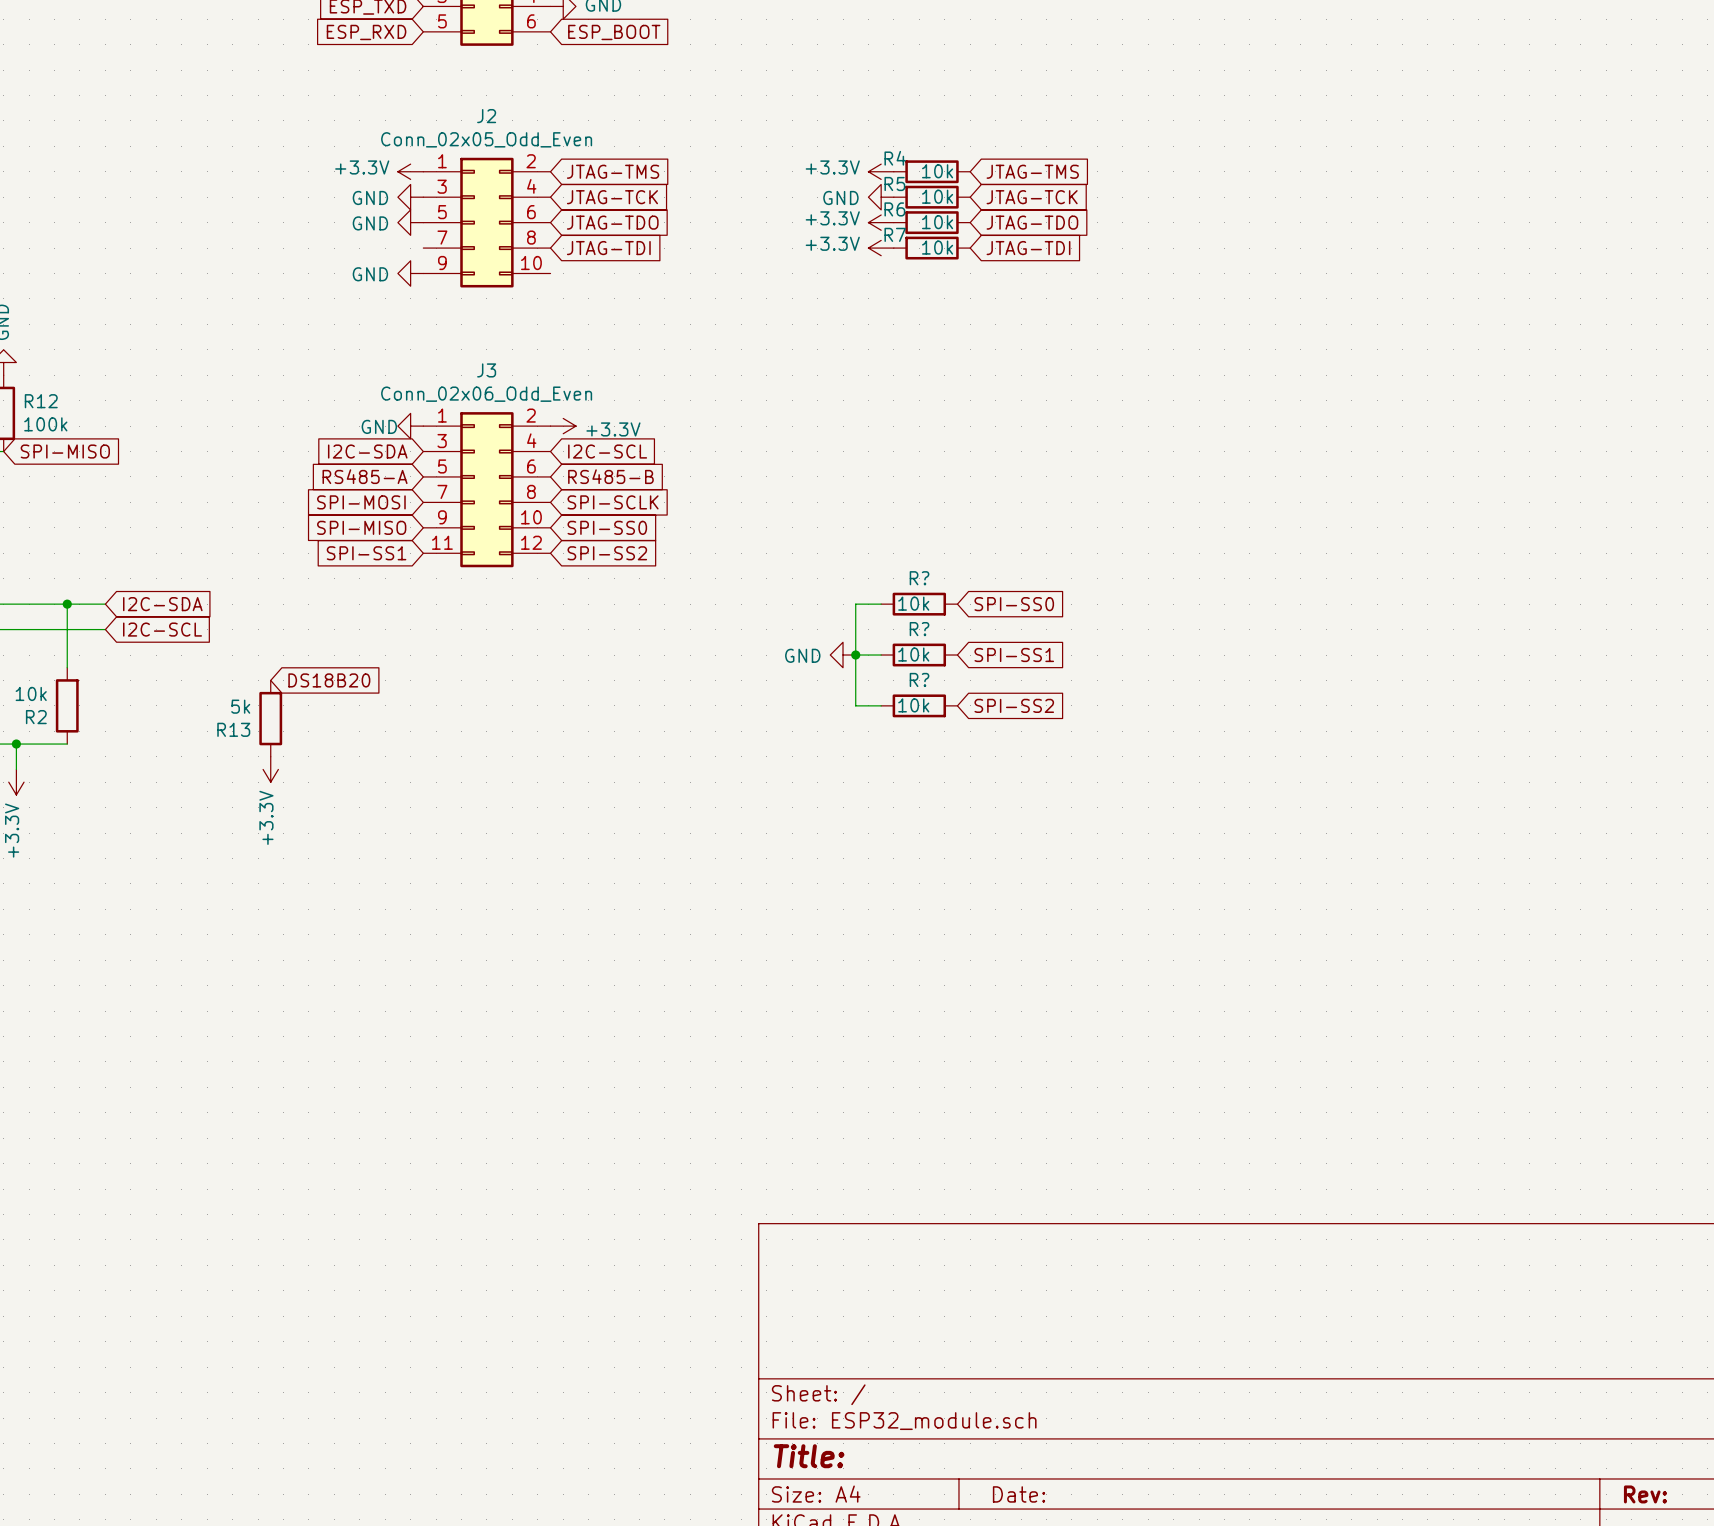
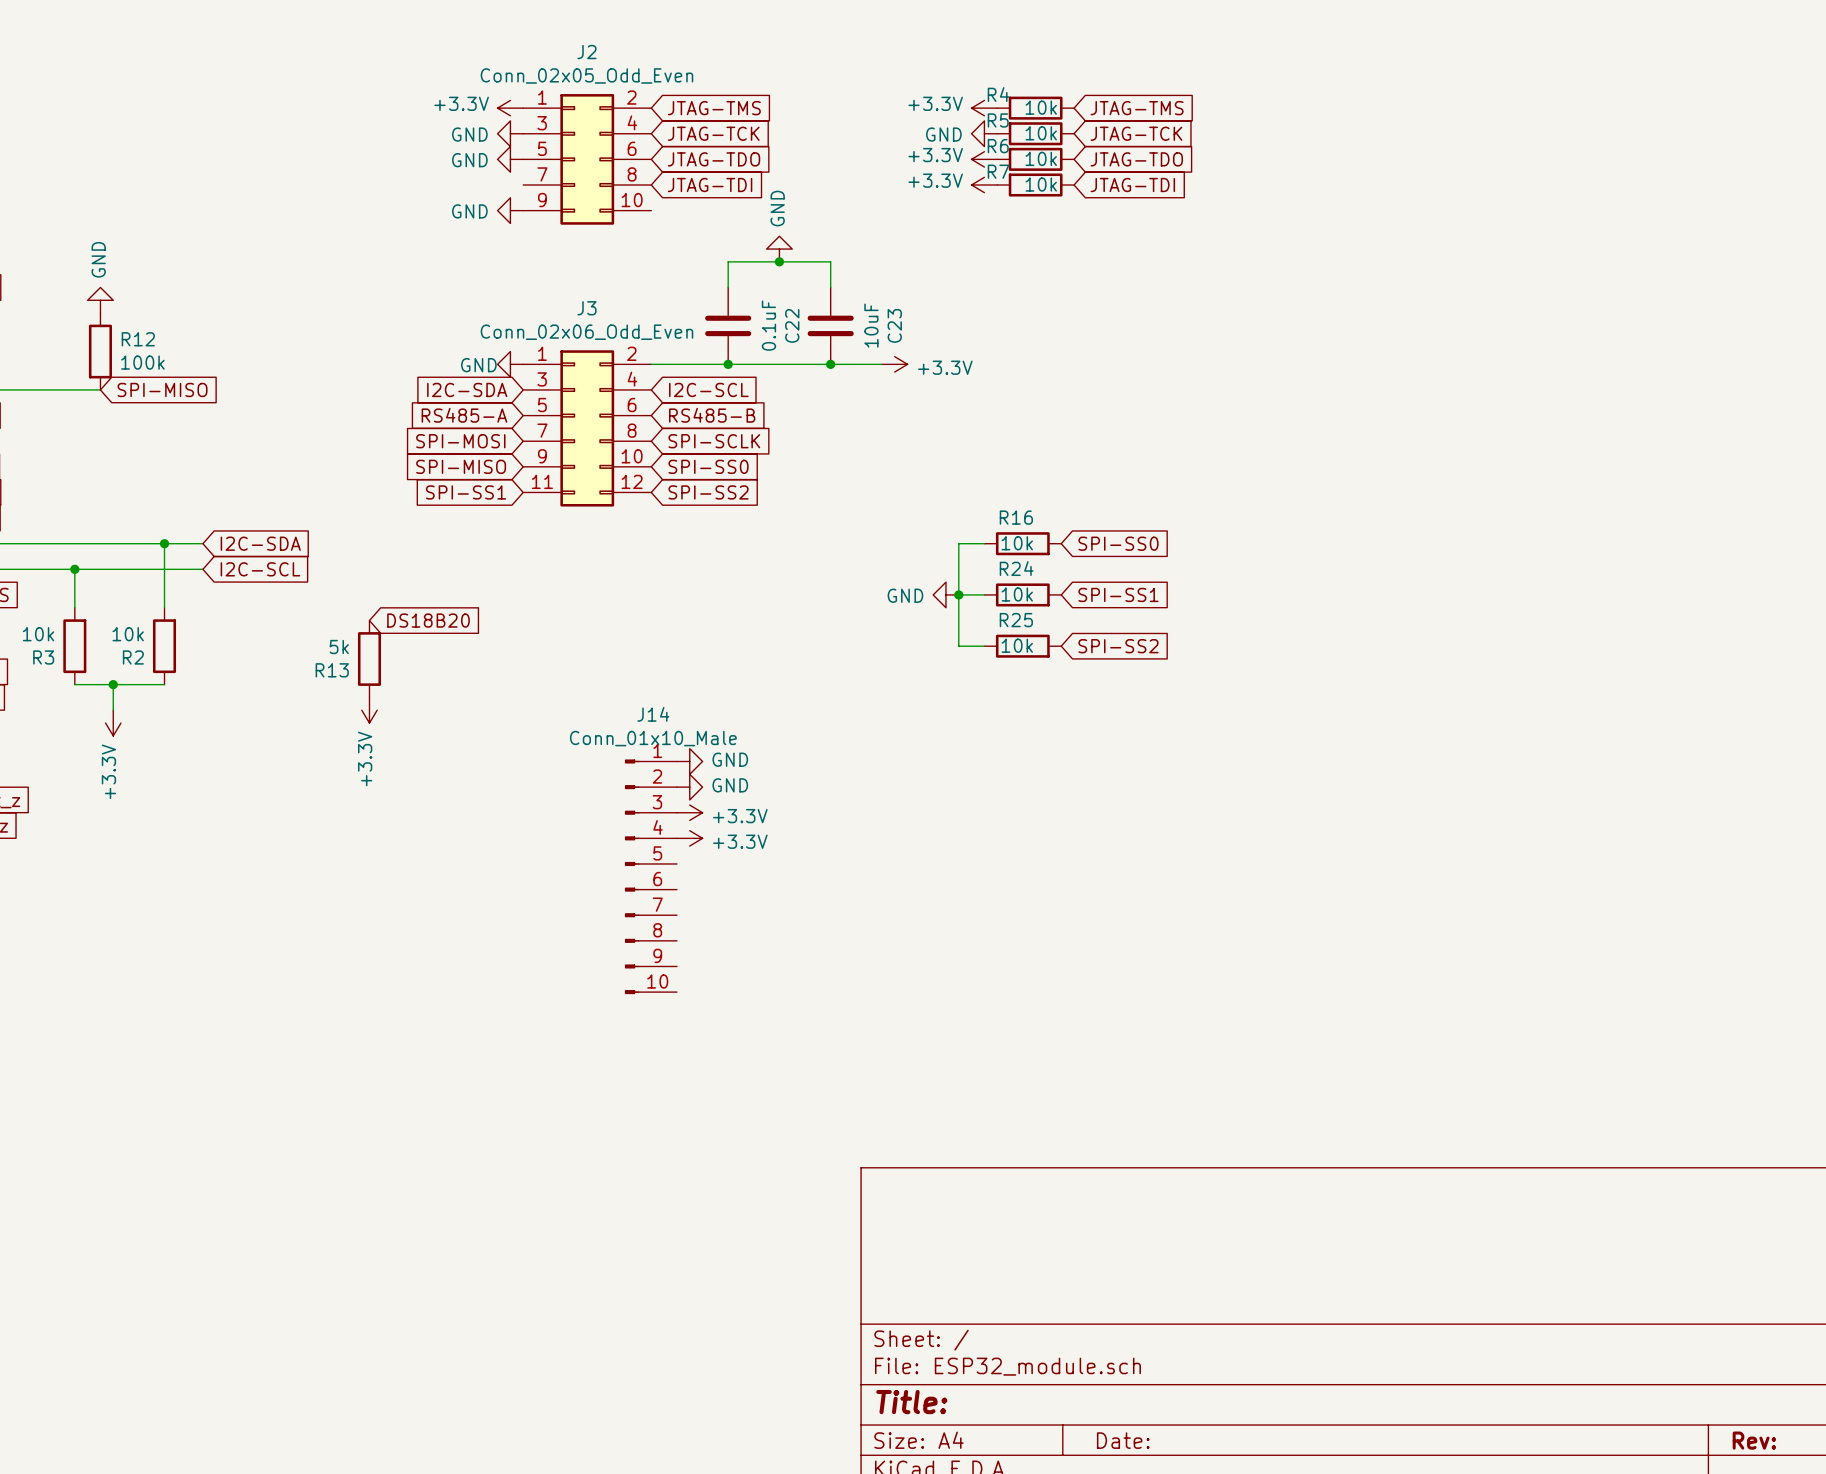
power symbol: none -> GND (779, 249)
junction: none -> (779, 261)
wire: none -> (728, 287) (728, 261) (830, 261) (830, 287)
C22: none -> 0.1uF (728, 325)
C23: none -> 10uF (830, 325)
wire: none -> (651, 364) (881, 364)
power symbol: +3.3V (563, 426) -> none
junction: none -> (728, 364)
junction: none -> (830, 364)
power symbol: none -> +3.3V (894, 364)
R? name: R? (919, 578) -> R16 (1016, 517)
R? name: R? (919, 629) -> R24 (1016, 568)
R? name: R? (919, 679) -> R25 (1016, 620)
power symbol: none -> GND (689, 761)
power symbol: none -> GND (689, 787)
power symbol: none -> +3.3V (689, 812)
power symbol: none -> +3.3V (689, 838)
J14: none -> Conn_01x10_Male (650, 876)

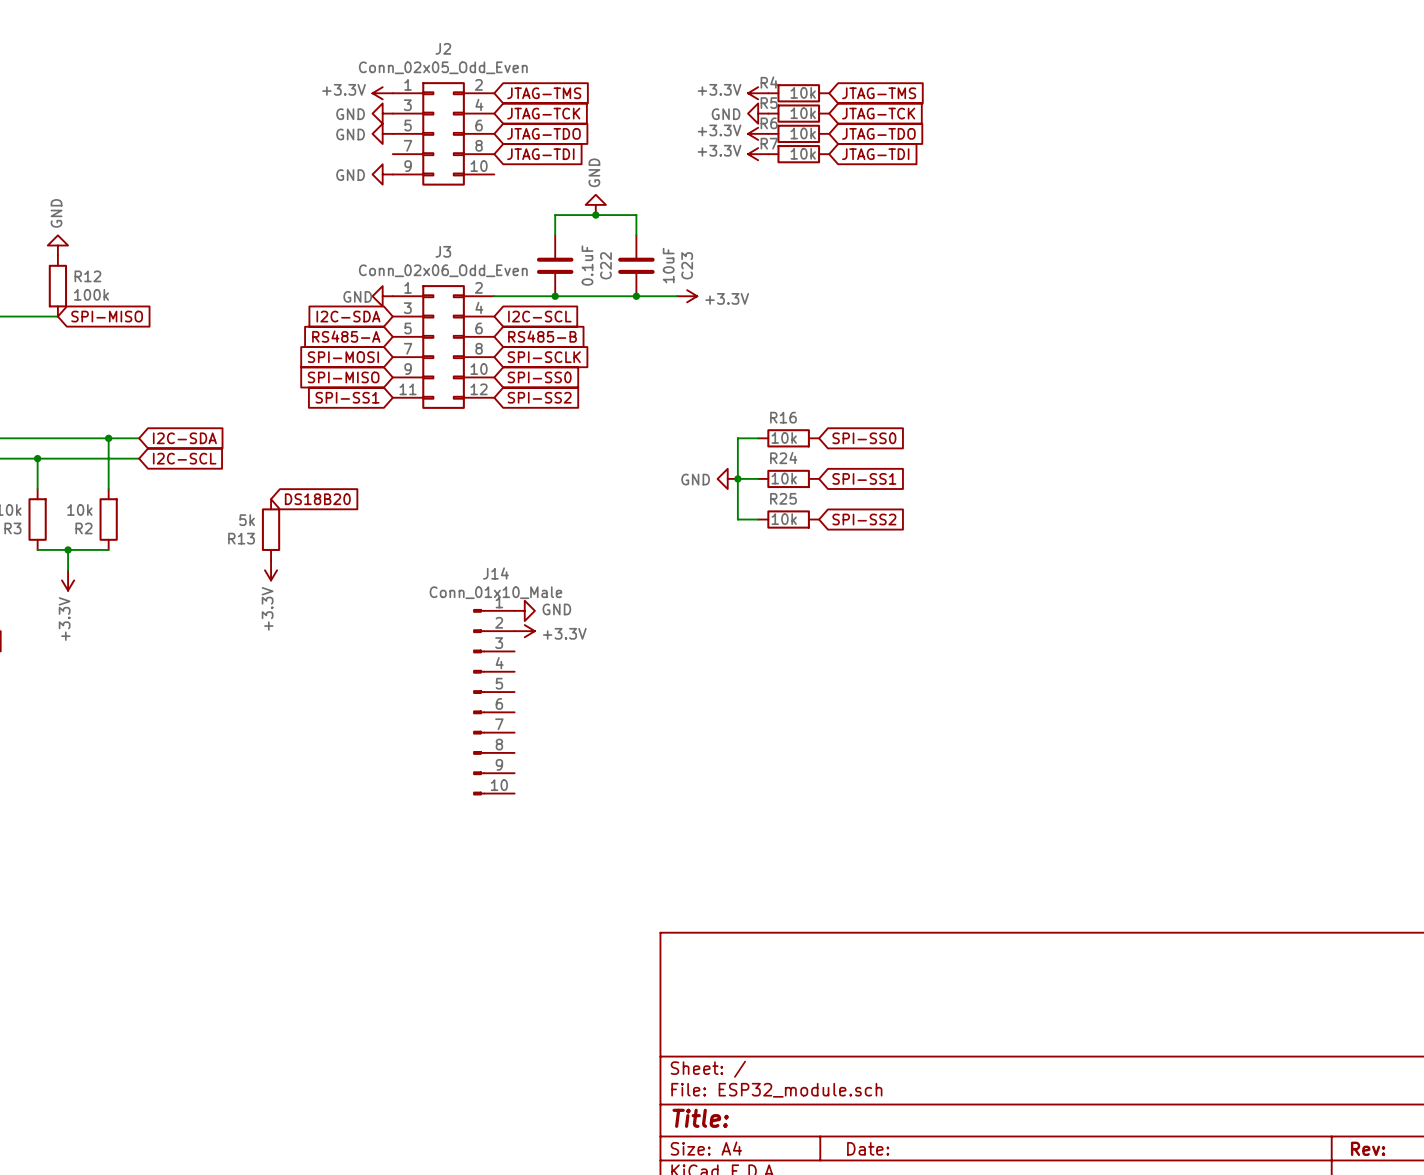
power symbol: GND (689, 787) -> +3.3V (524, 631)
power symbol: +3.3V (689, 812) -> none
power symbol: +3.3V (689, 838) -> none

